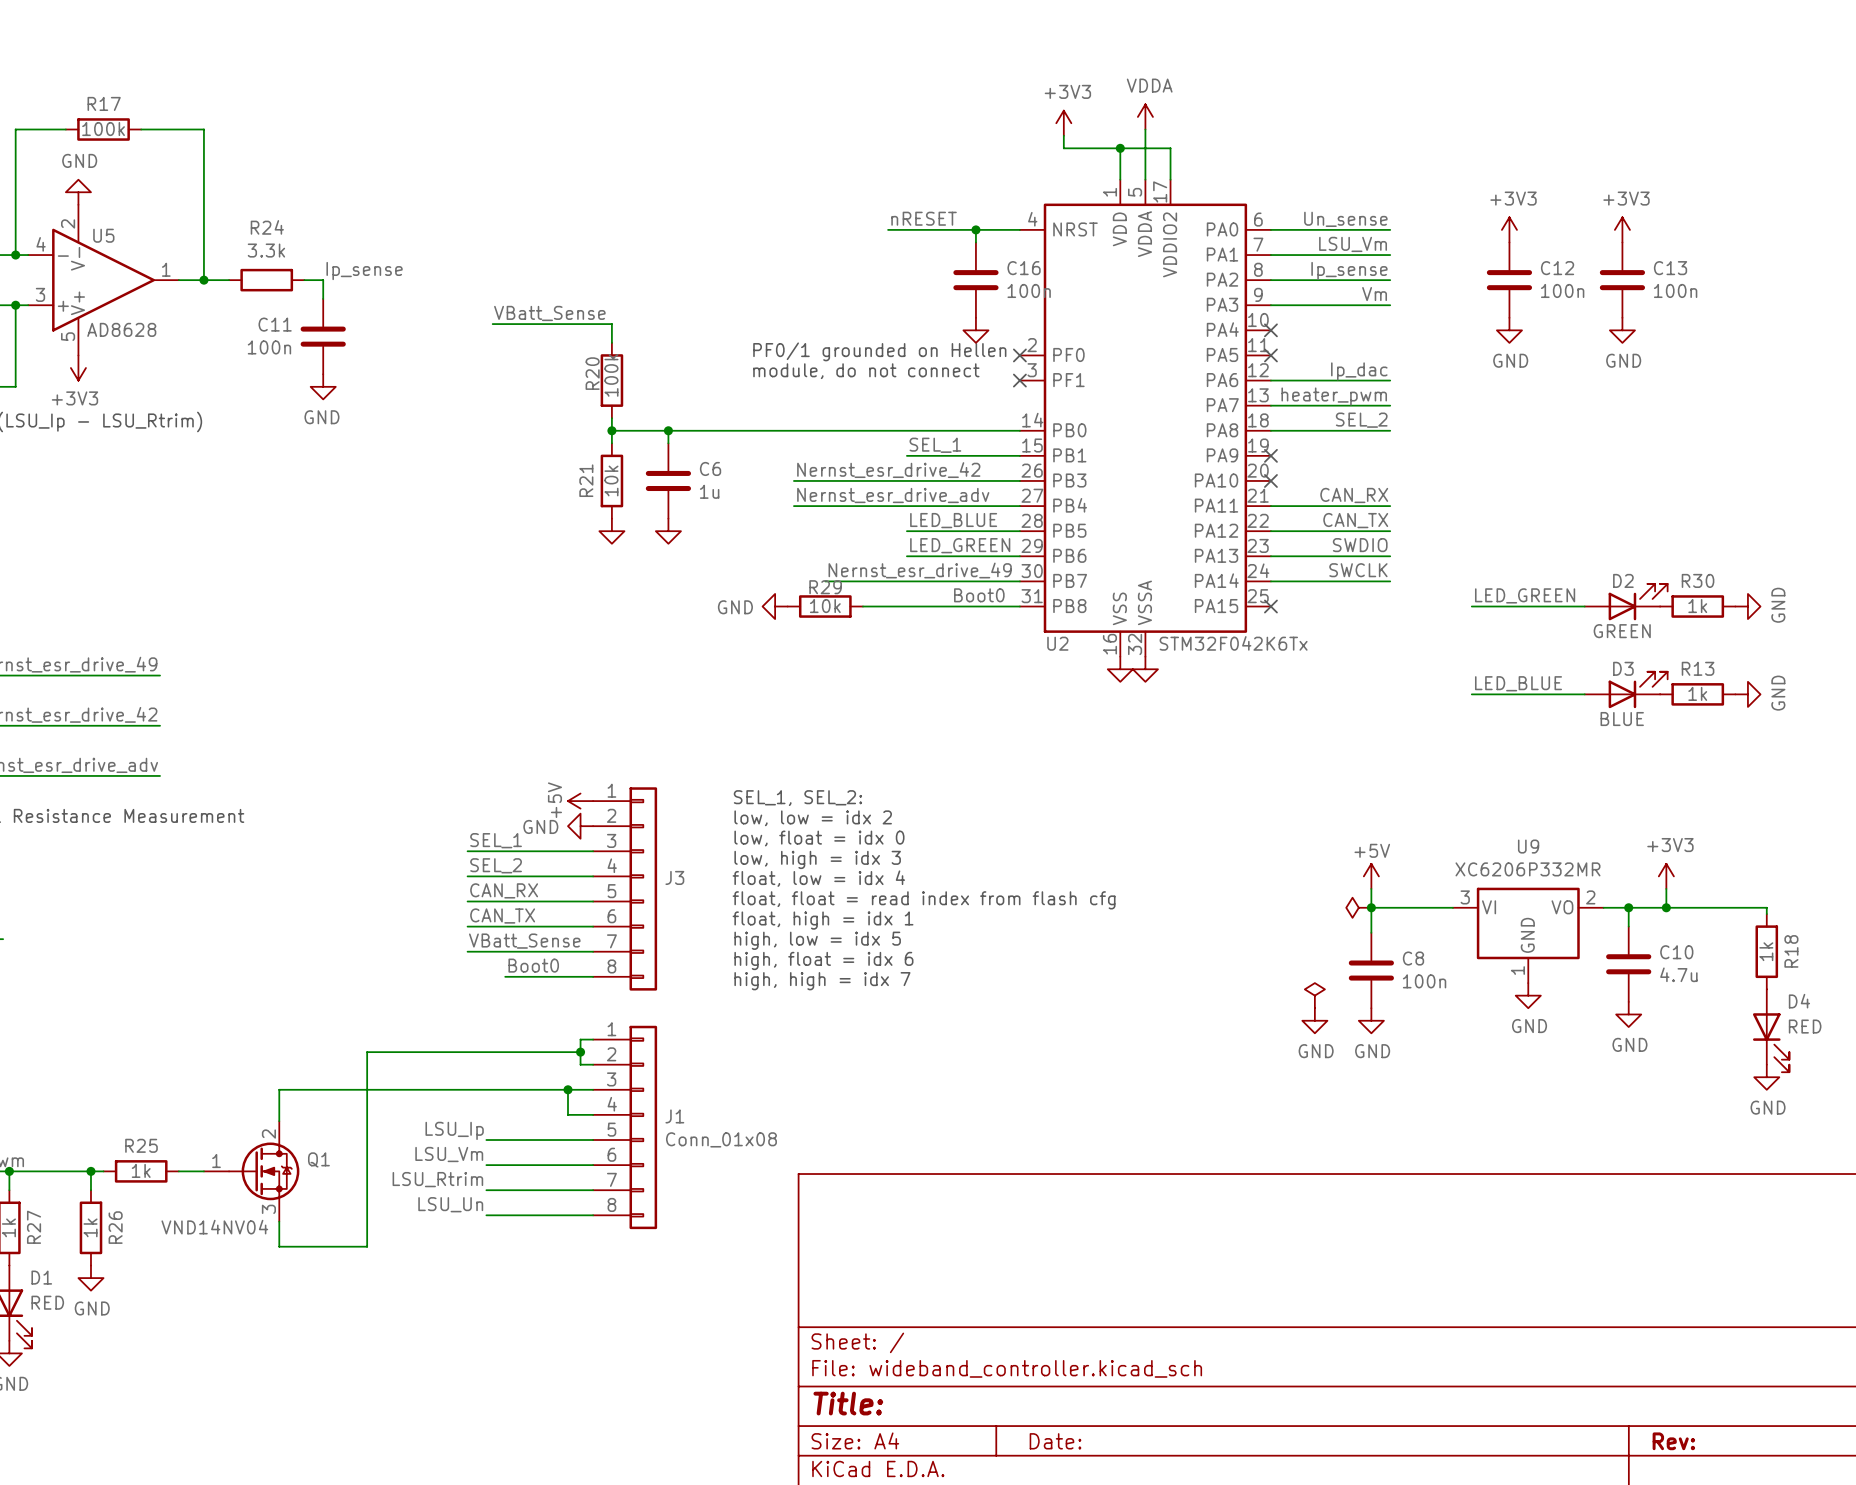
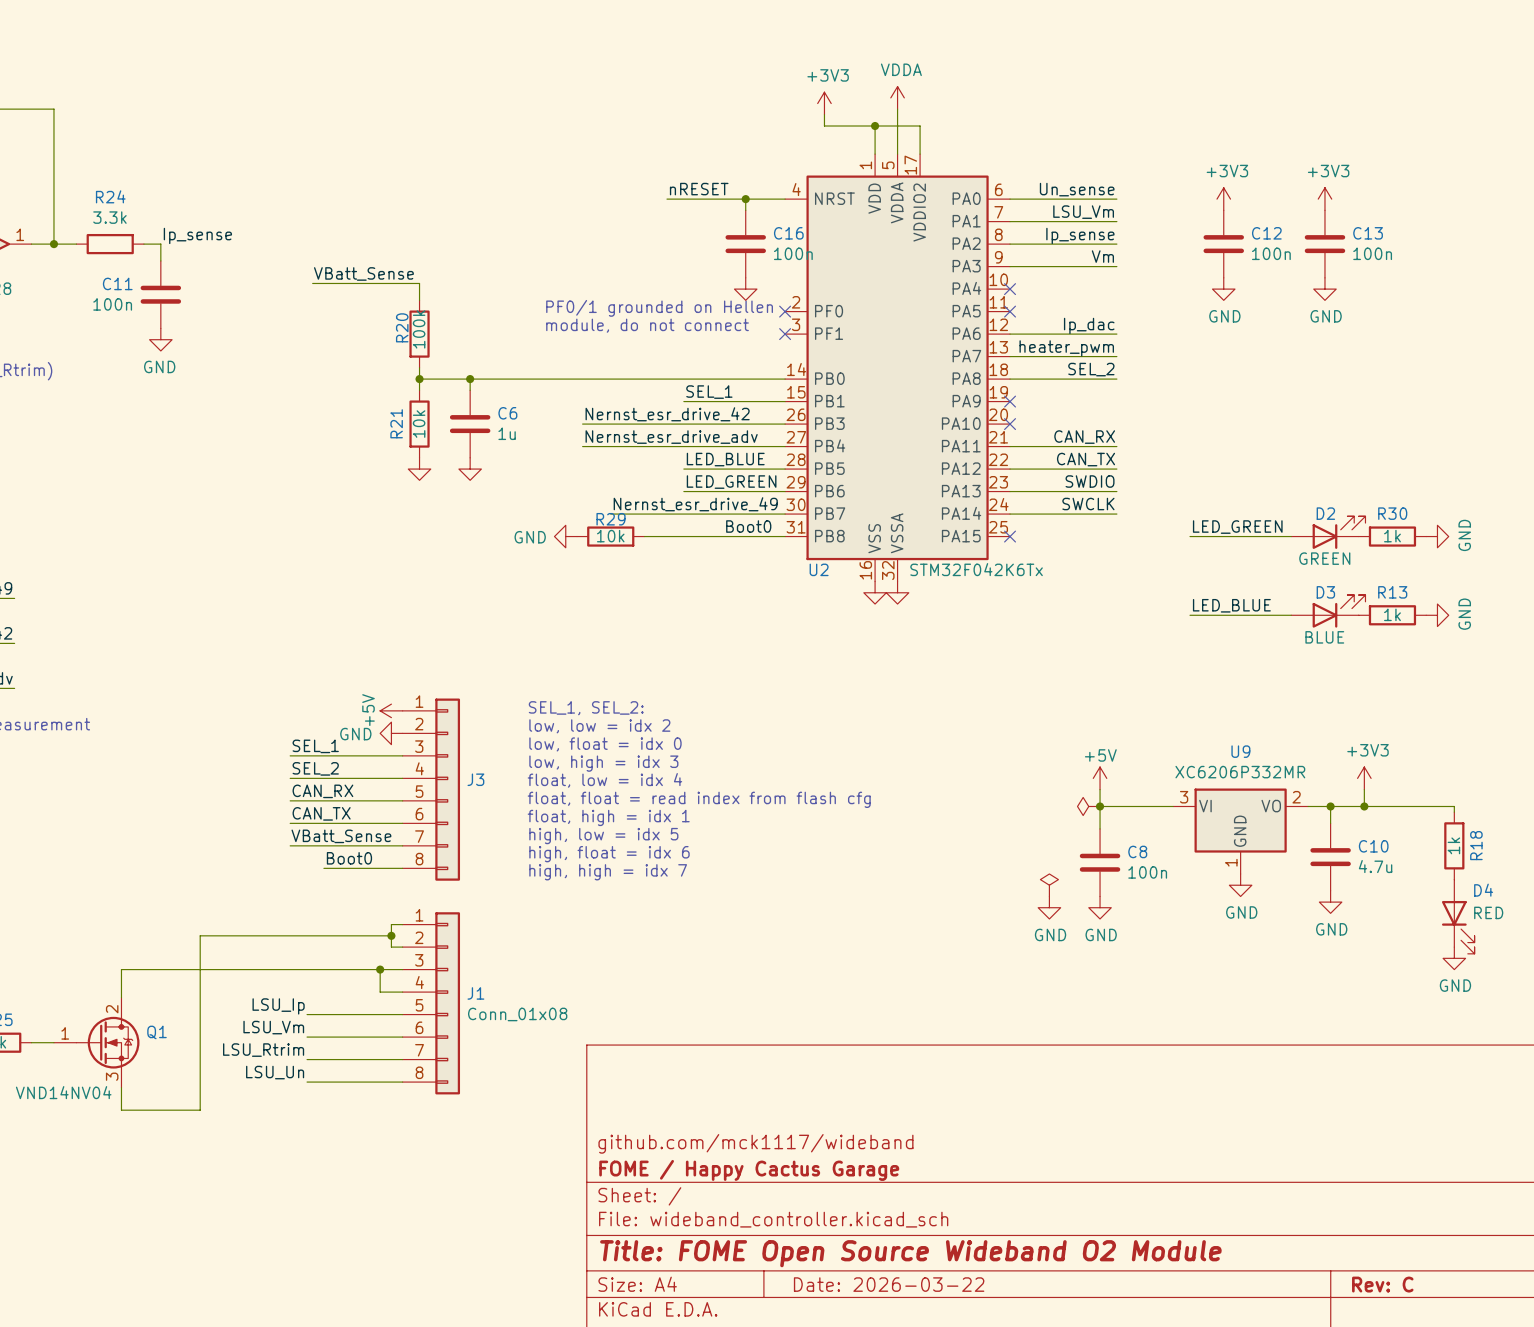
title block: none -> github.com/mck1117/wideband (755, 1143)
title block: none -> FOME / Happy Cactus Garage (749, 1170)
title block: Title: (848, 1403) -> Title: FOME Open Source Wideband O2 Module (910, 1253)
title block: Date: (1055, 1441) -> Date: 2026-03-22 (889, 1284)
title block: Rev: (1673, 1441) -> Rev: C (1382, 1284)

